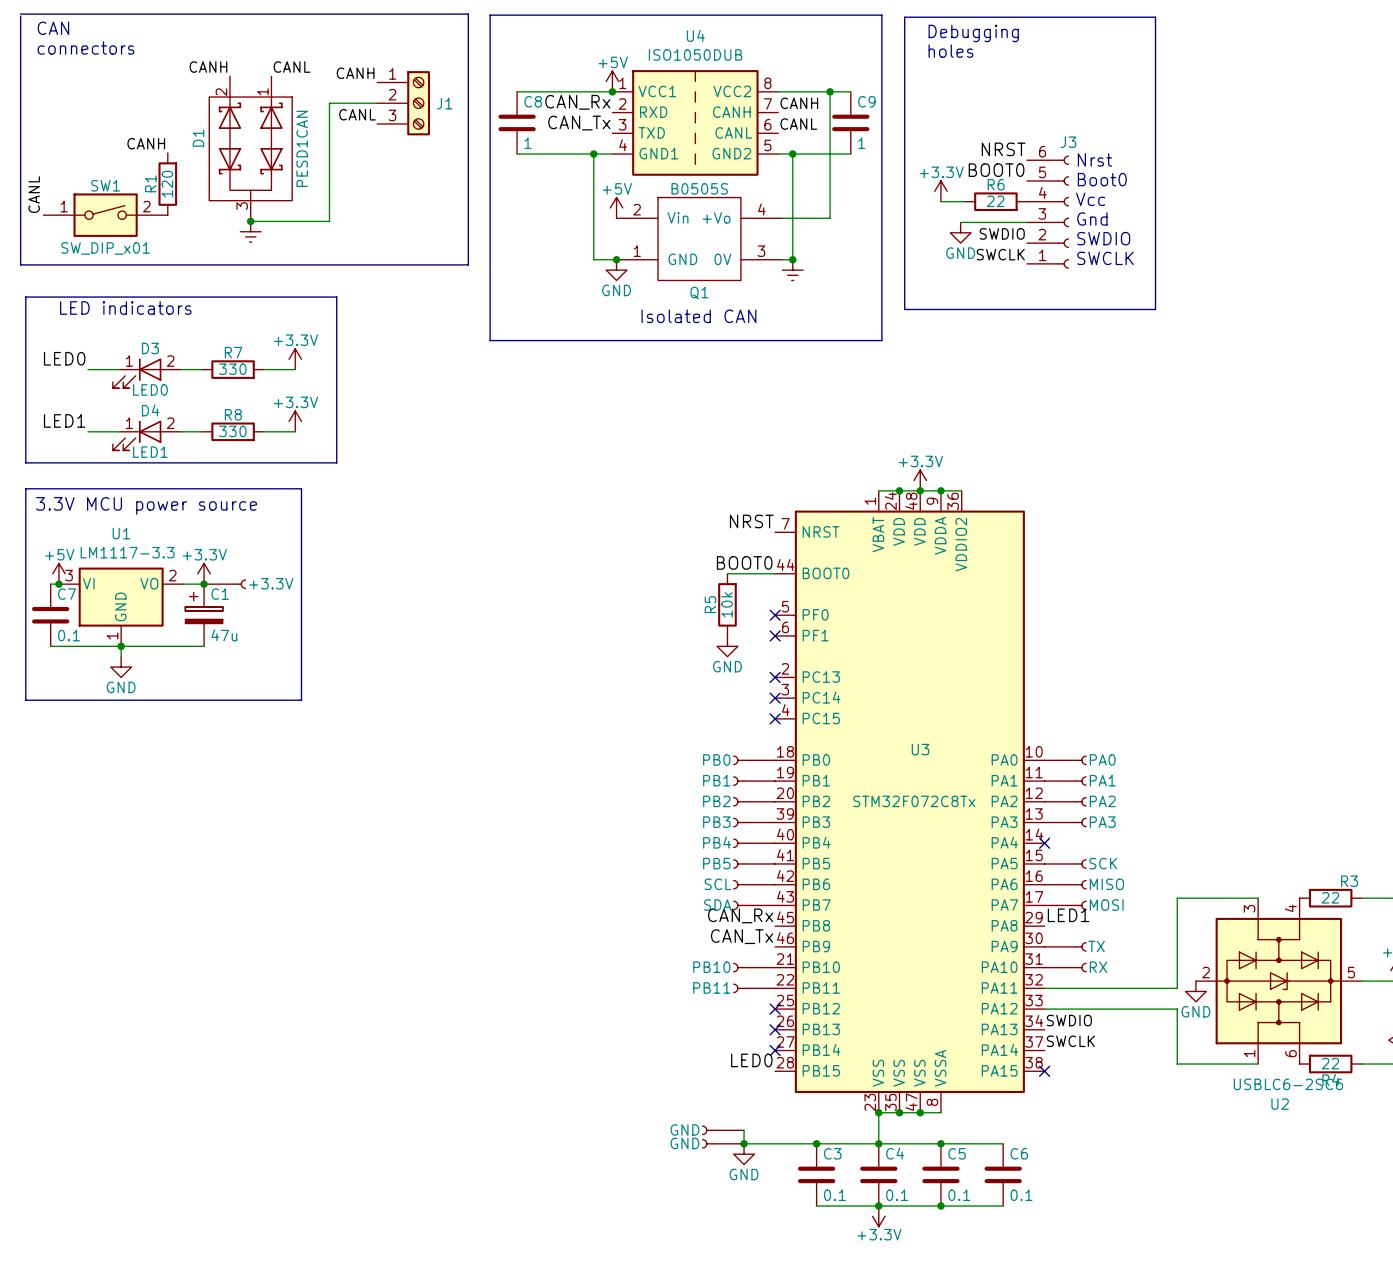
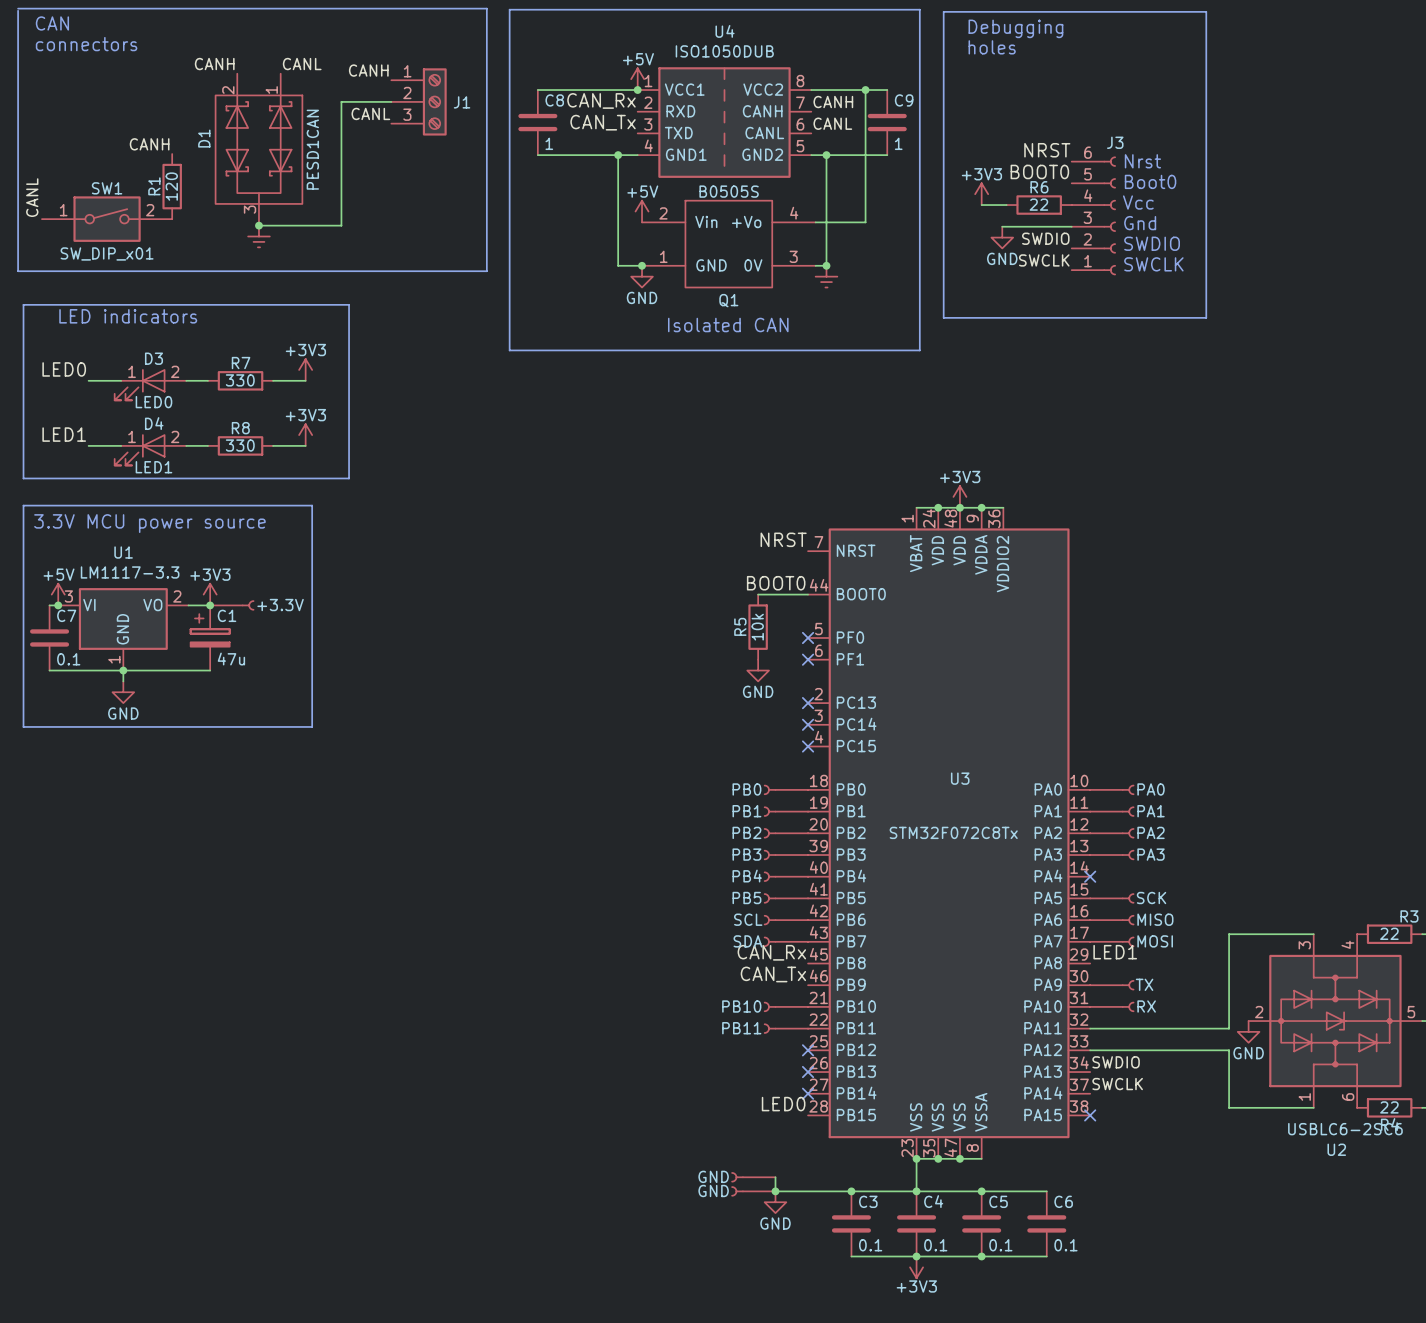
power symbol: +3.3V (940, 191) -> +3V3 (981, 194)
power symbol: +3.3V (295, 359) -> +3V3 (305, 369)
power symbol: +3.3V (295, 421) -> +3V3 (305, 435)
power symbol: +3.3V (920, 480) -> +3V3 (959, 496)
power symbol: +3.3V (204, 573) -> +3V3 (210, 594)
power symbol: +3.3V (878, 1216) -> +3V3 (916, 1267)

